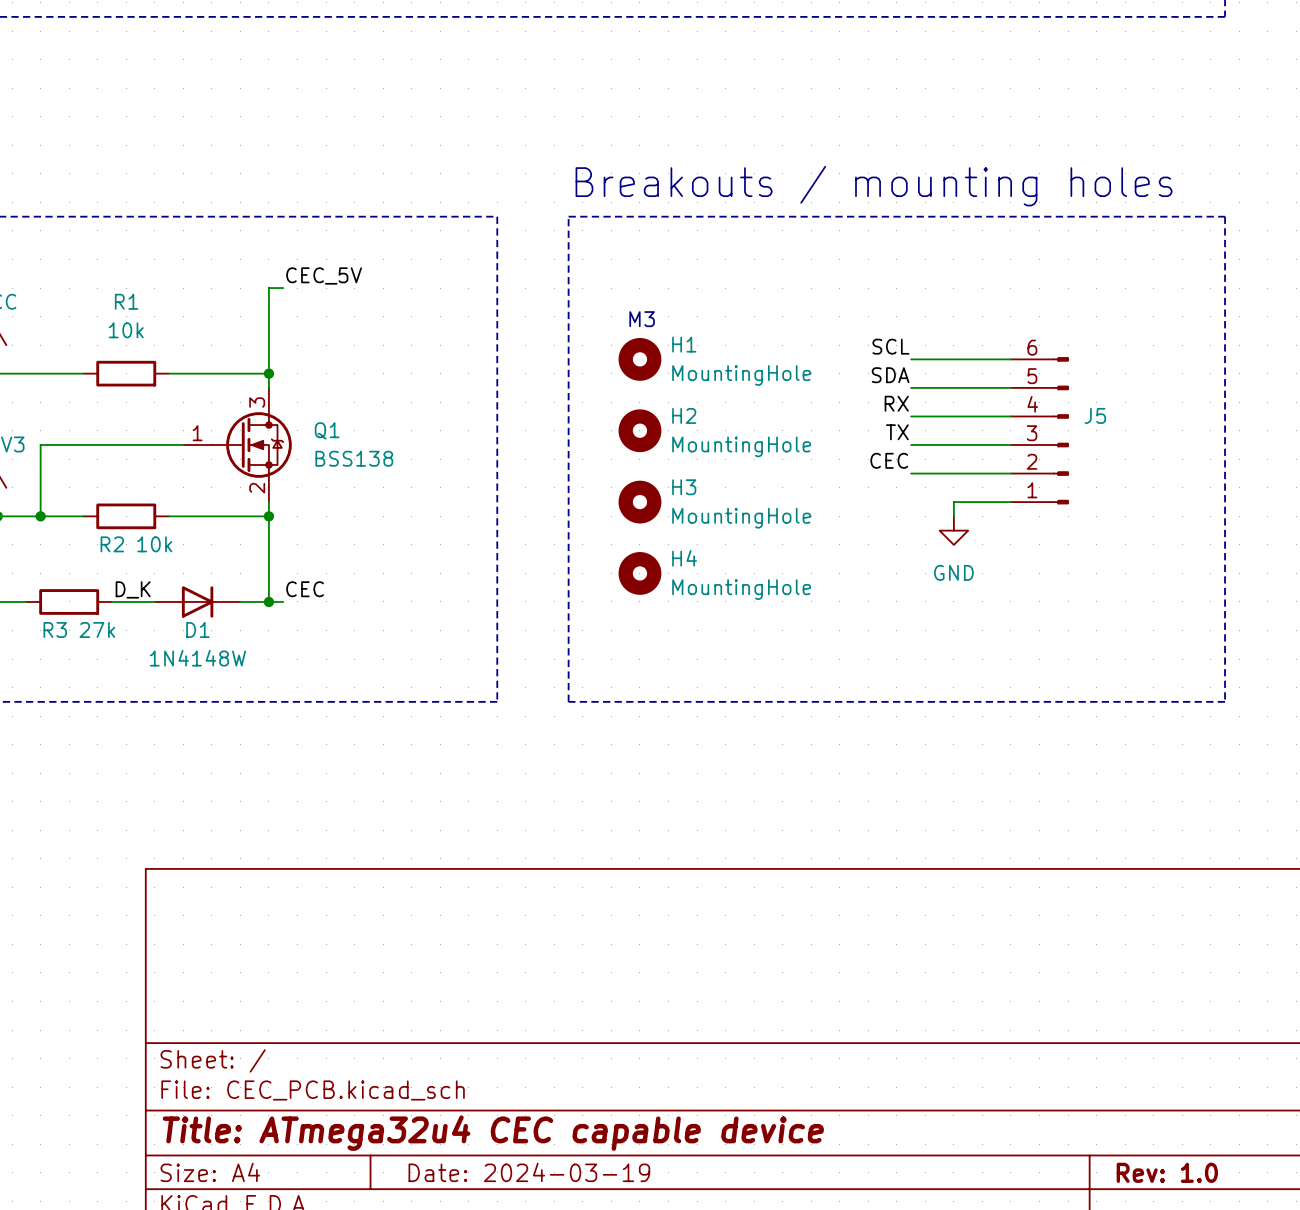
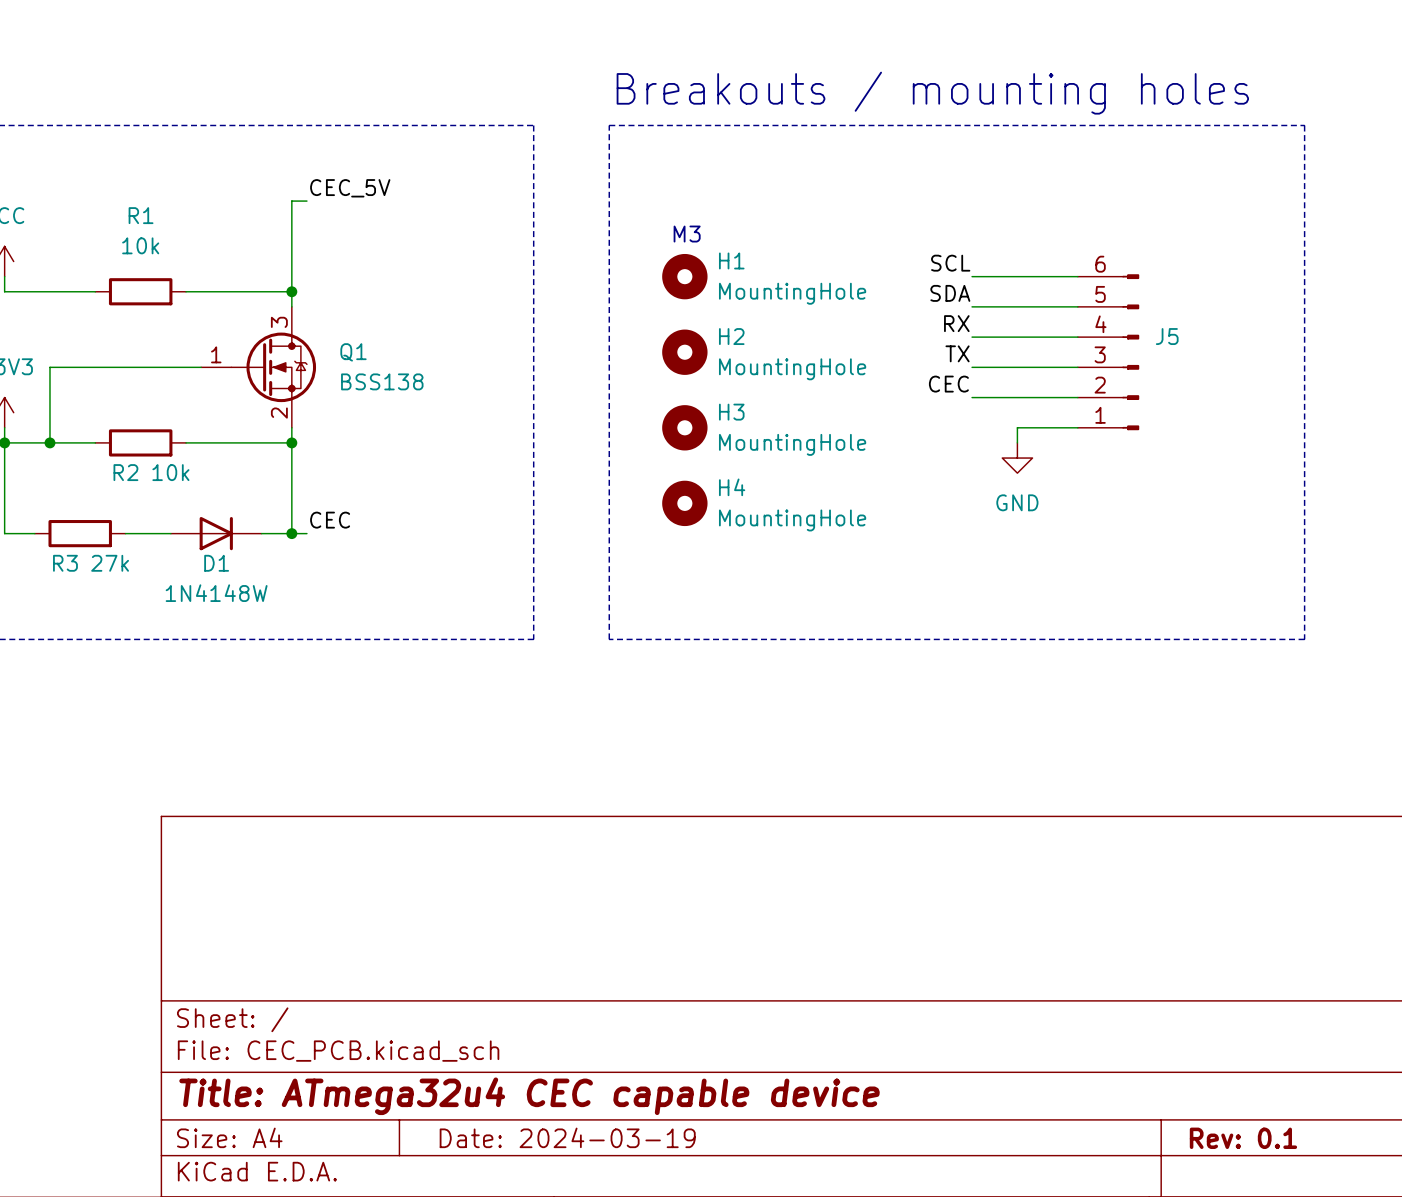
label: D_K (133, 589) -> none
title block: Rev: 1.0 (1167, 1172) -> Rev: 0.1 (1243, 1138)

